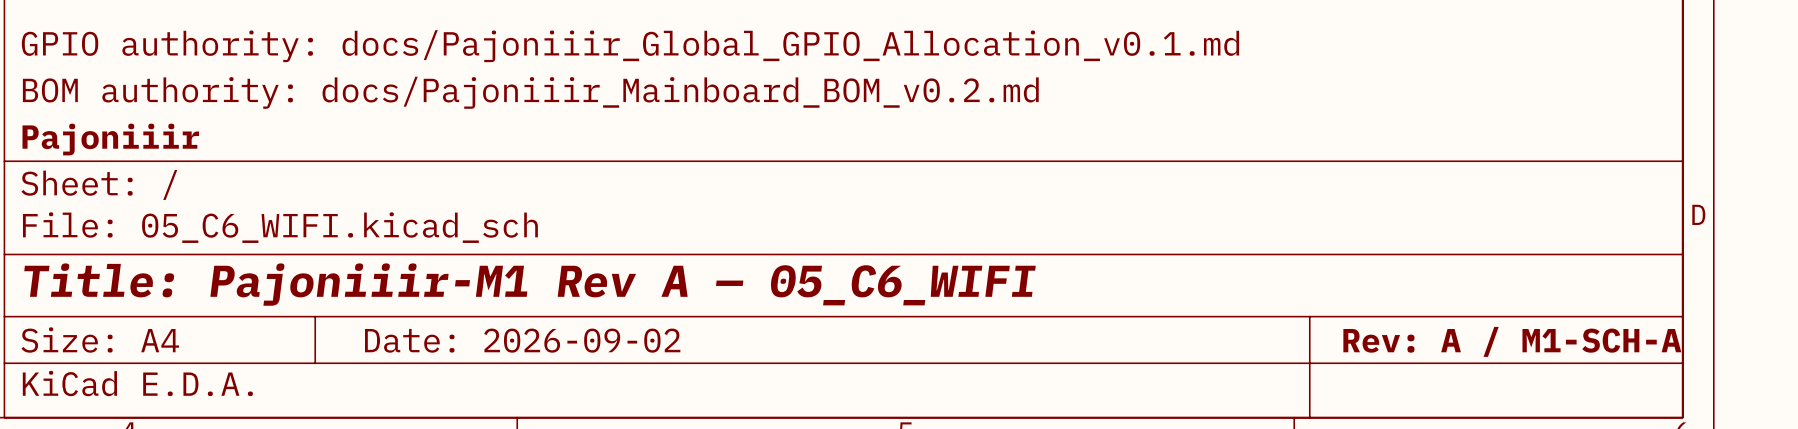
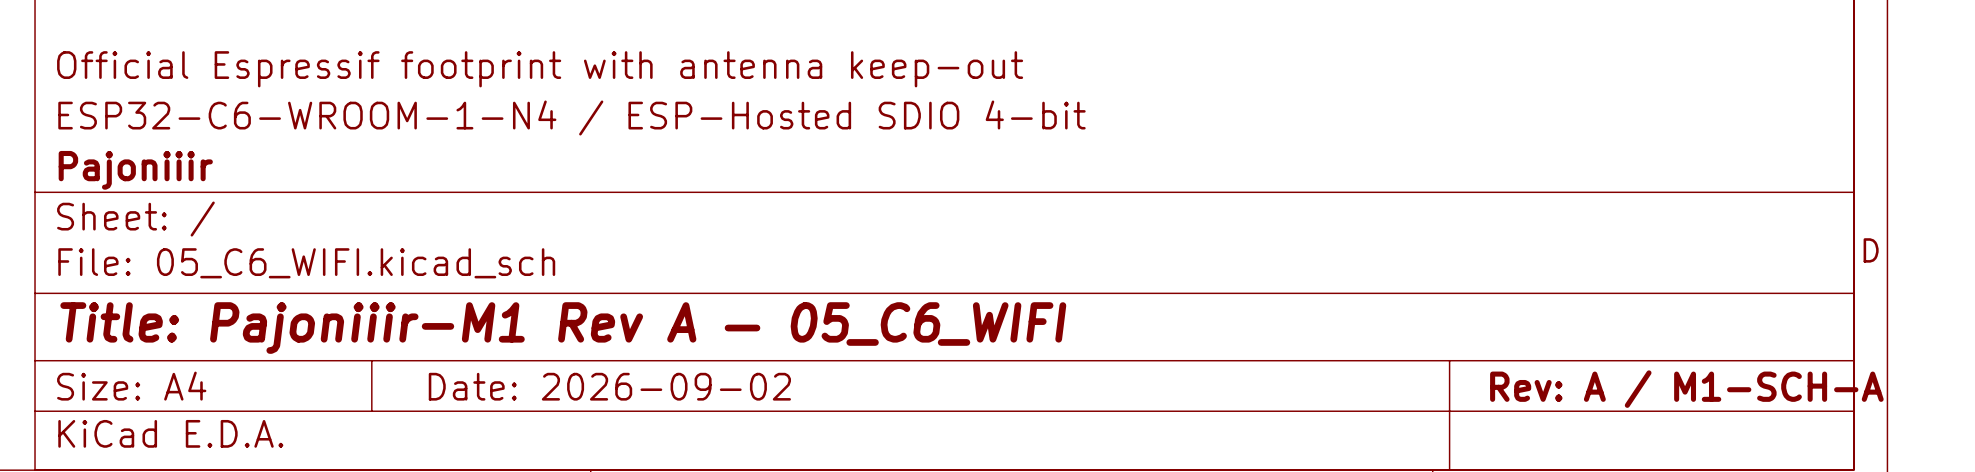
title block: GPIO authority: docs/Pajoniiir_Global_GPIO_Allocation_v0.1.md (630, 46) -> Official Espressif footprint with antenna keep-out (540, 69)
title block: BOM authority: docs/Pajoniiir_Mainboard_BOM_v0.2.md (530, 92) -> ESP32-C6-WROOM-1-N4 / ESP-Hosted SDIO 4-bit (571, 117)

